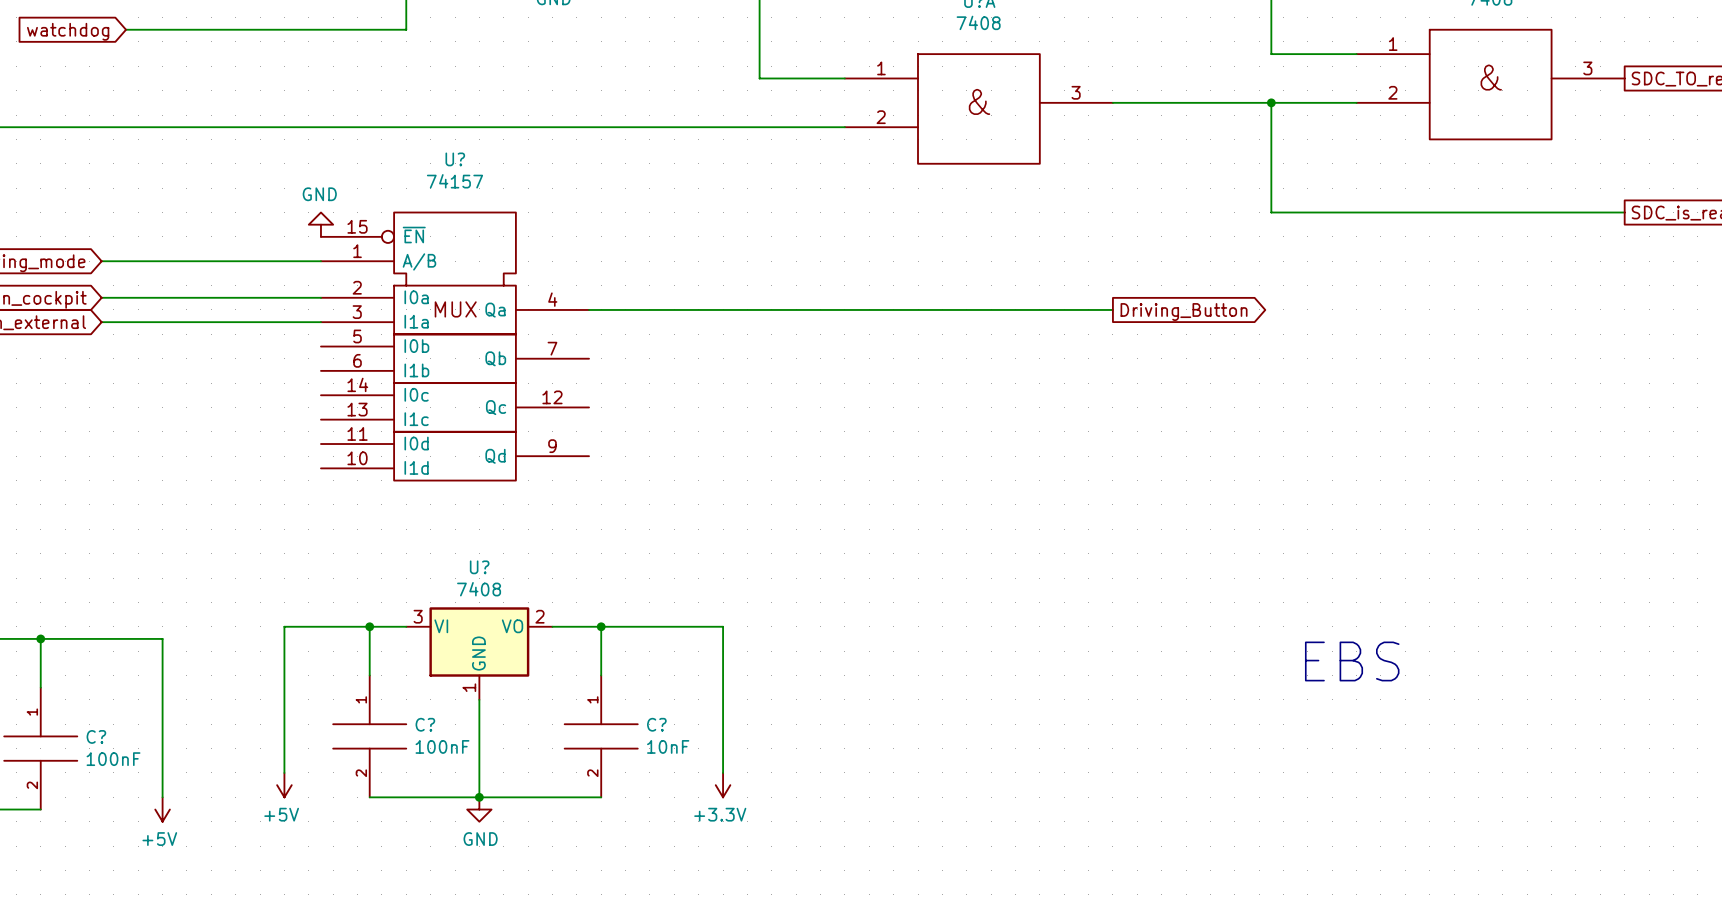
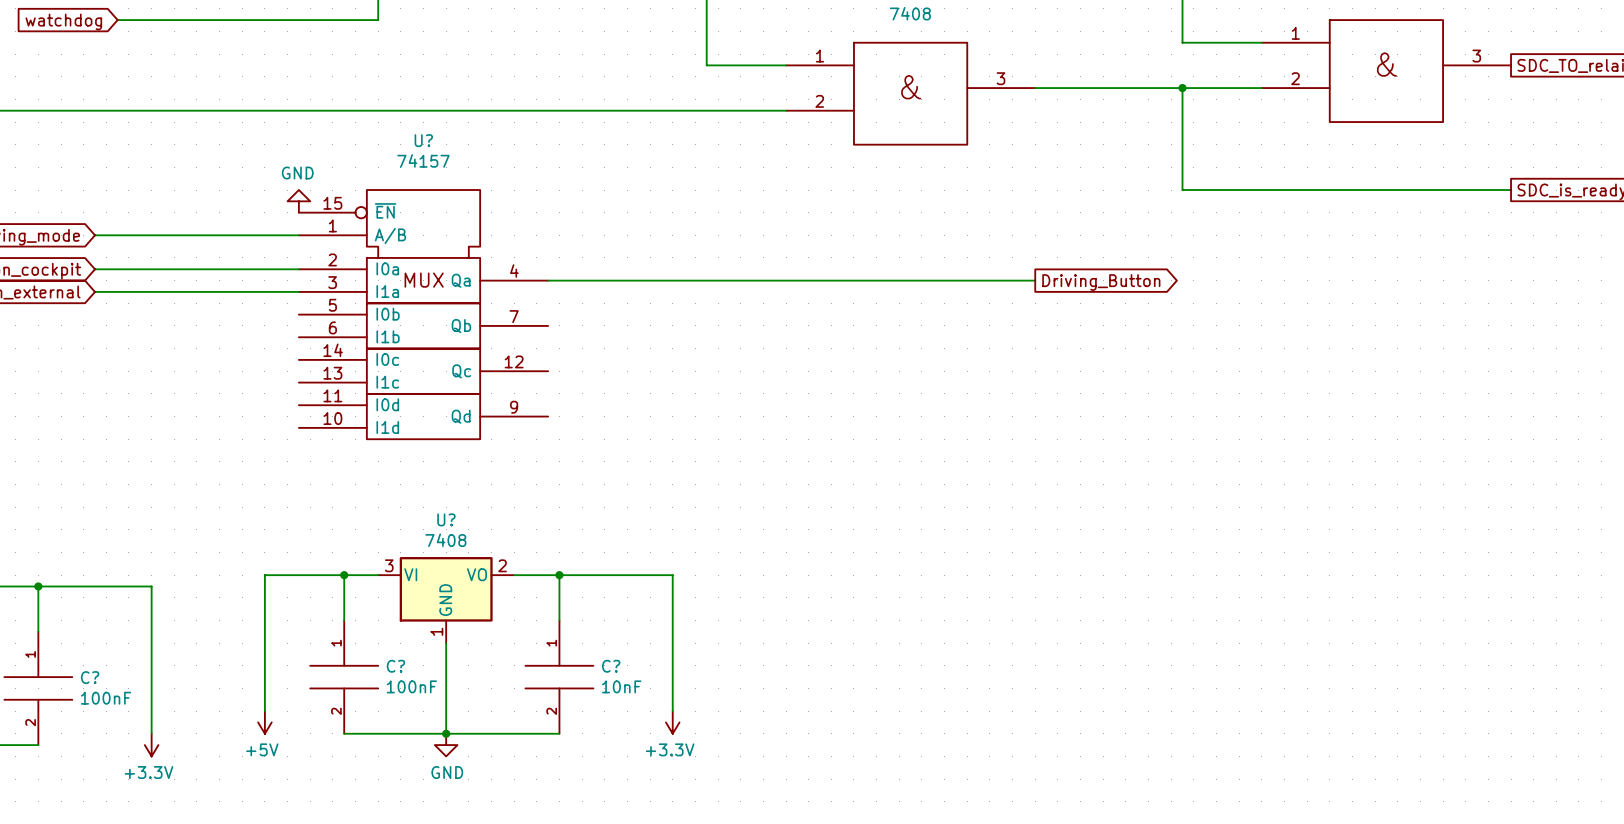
text: EBS (1352, 661) -> none
power symbol: +5V (162, 809) -> +3.3V (151, 745)

